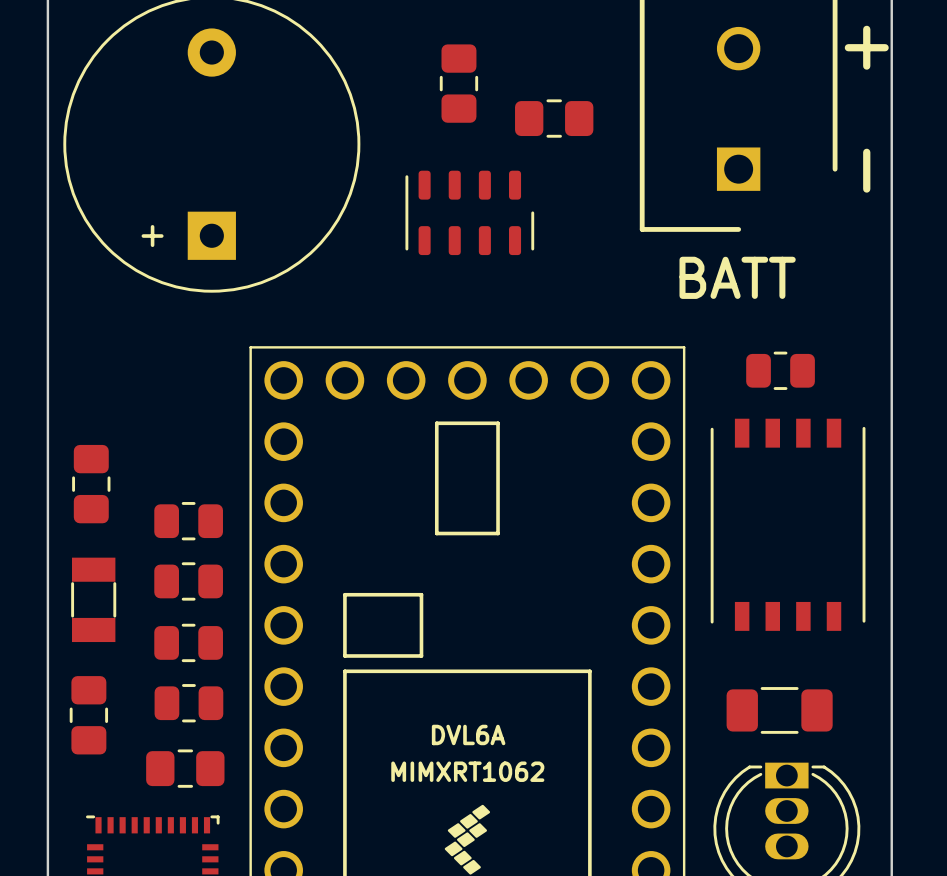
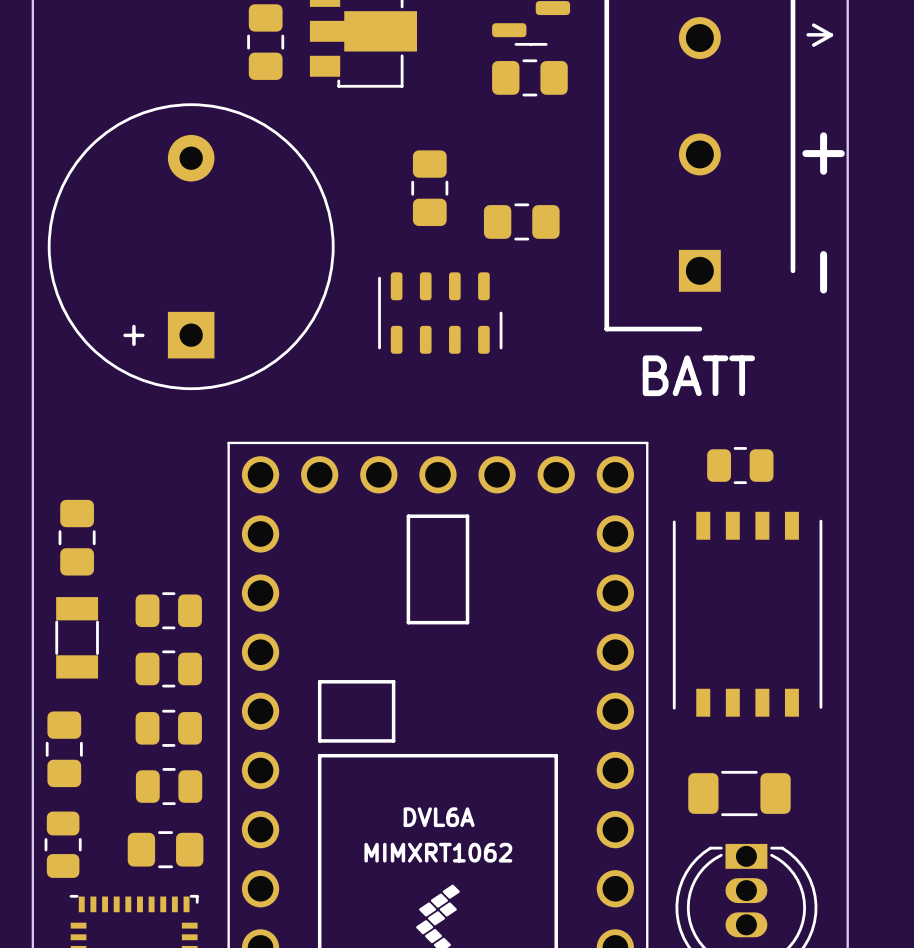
part position: (91, 484) -> (77, 537)
part position: (93, 599) -> (77, 637)
part position: (88, 715) -> (64, 749)
part: none -> (63, 844)

